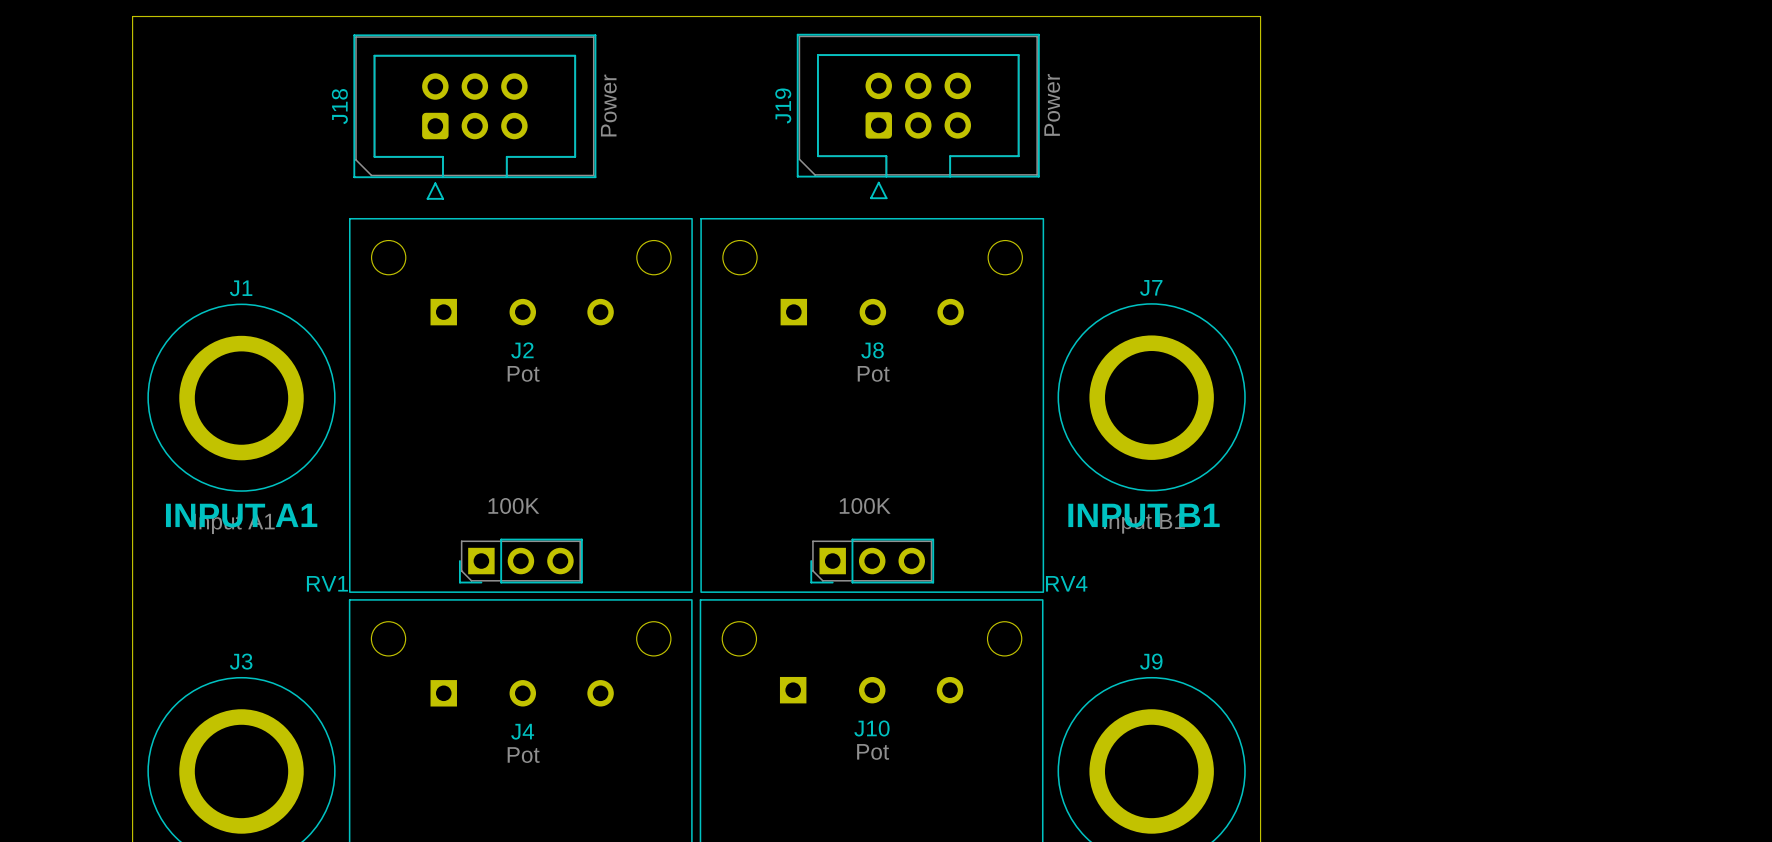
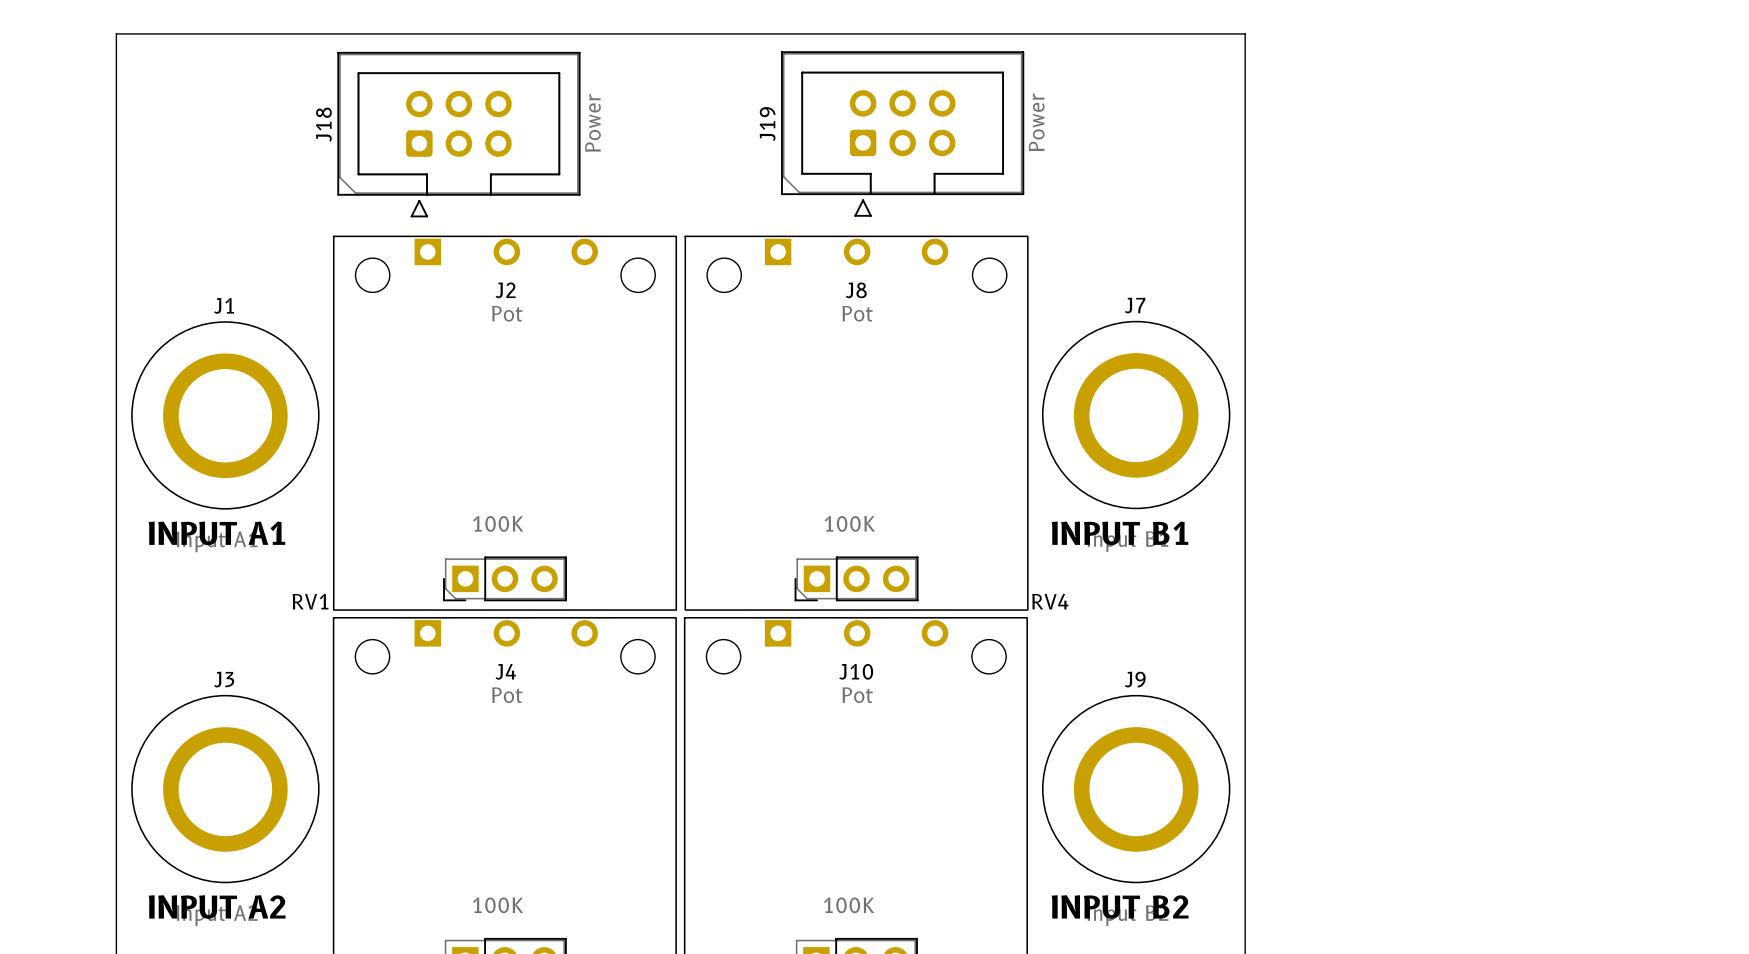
J2 position: (522, 312) -> (506, 251)
J8 position: (872, 312) -> (856, 251)
J10 position: (871, 690) -> (856, 633)
J4 position: (522, 693) -> (506, 633)

